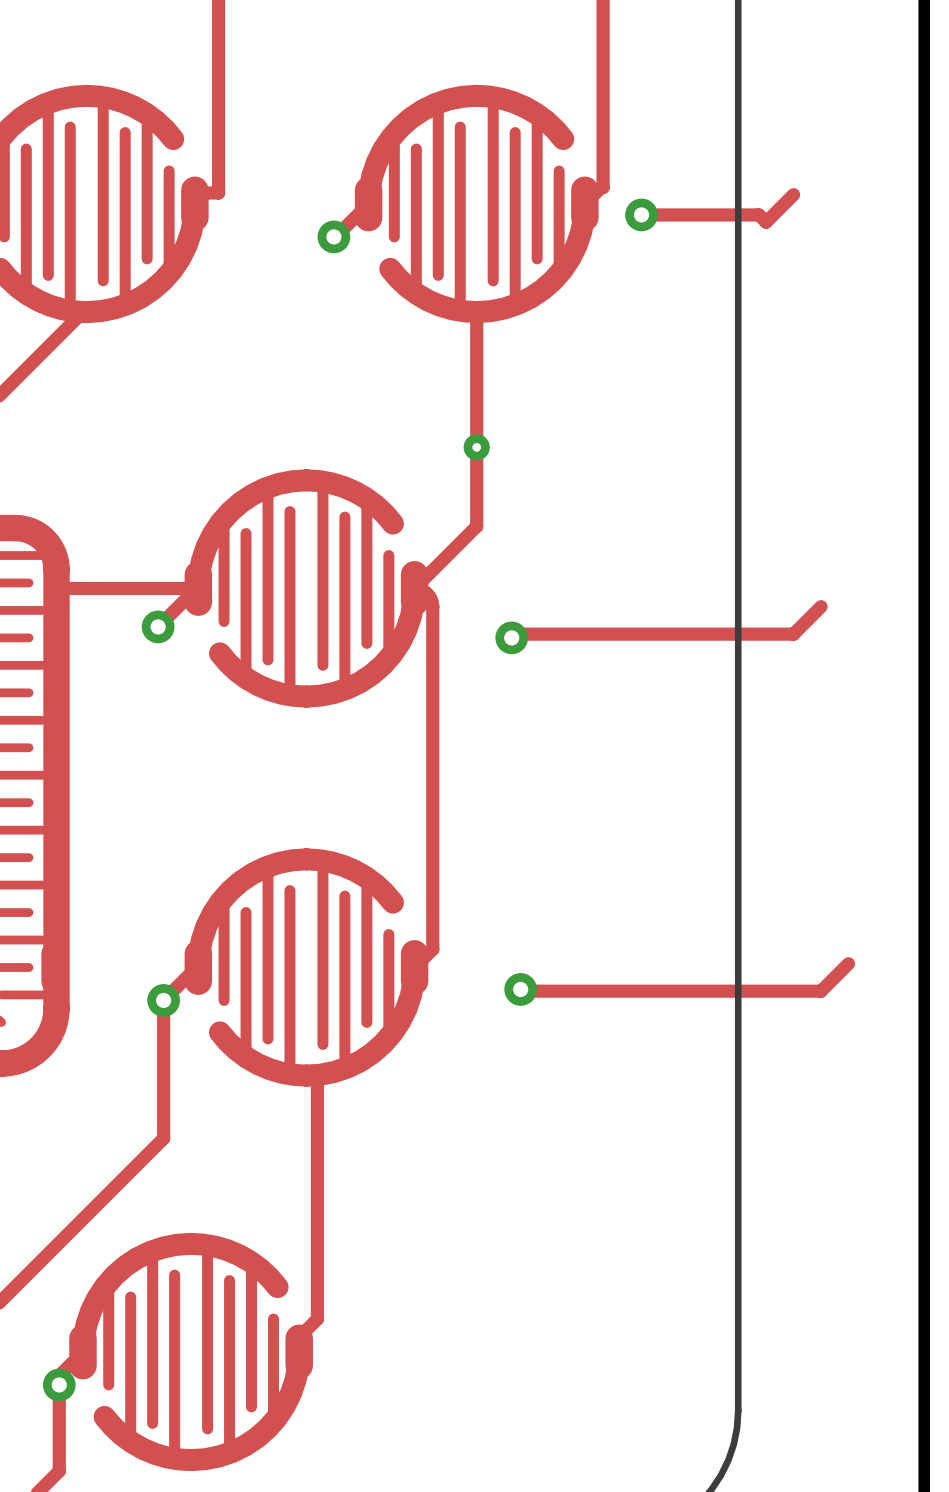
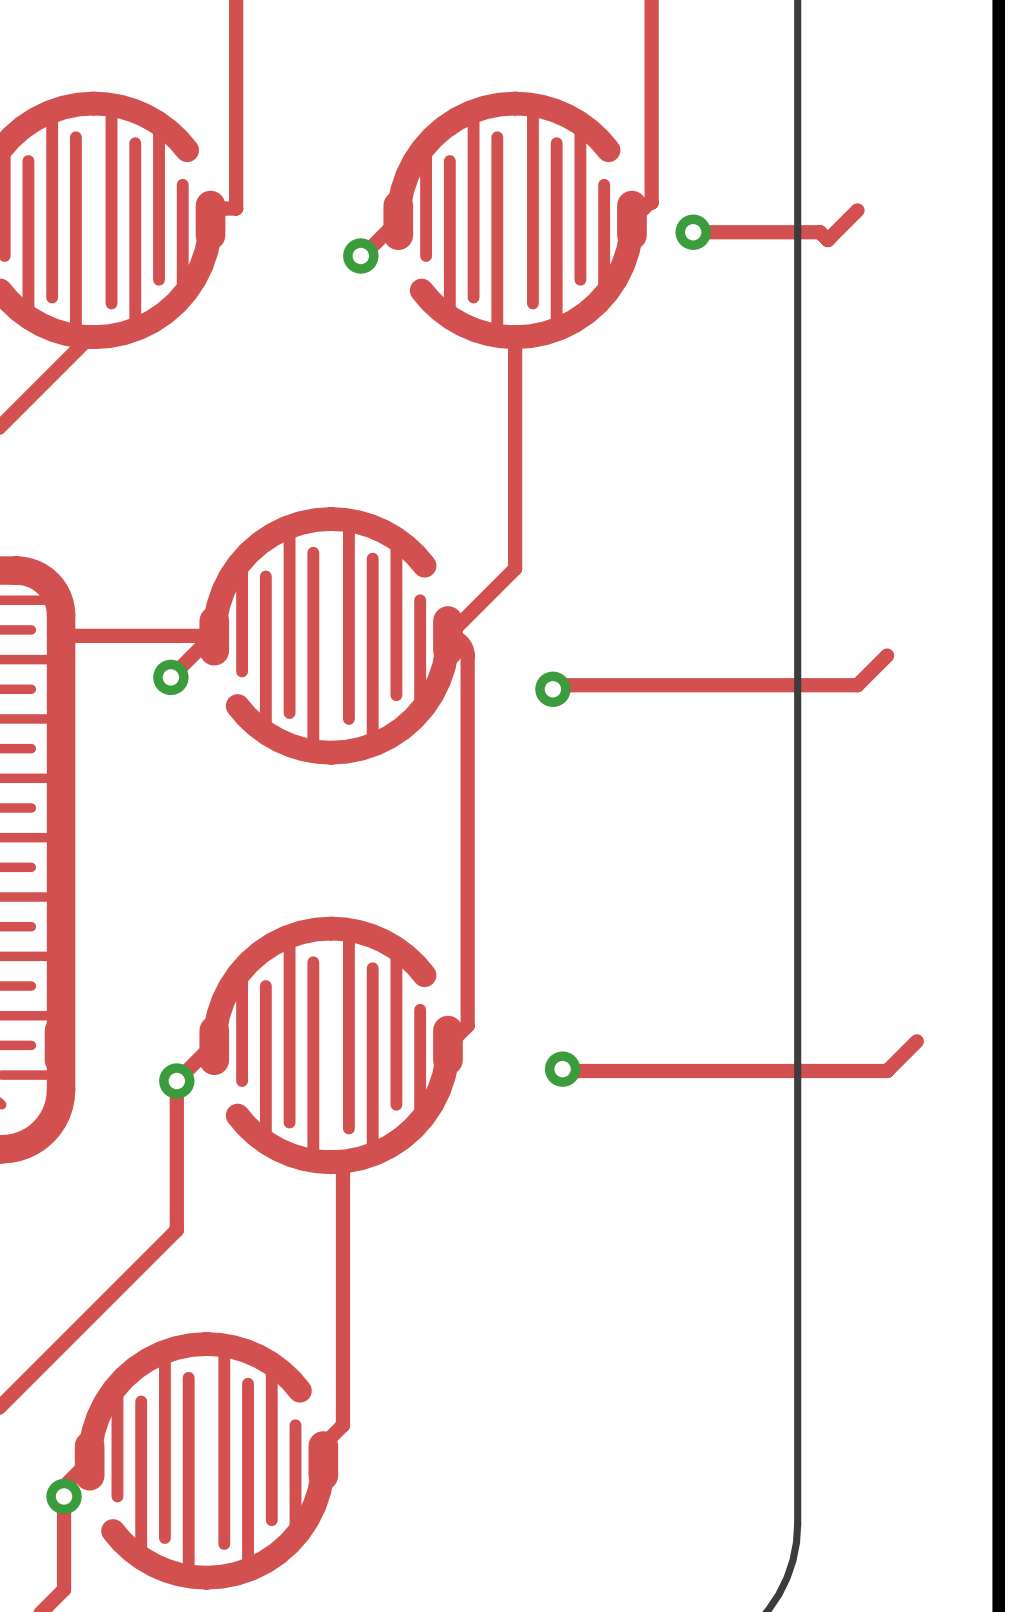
via: (476, 447) -> none

